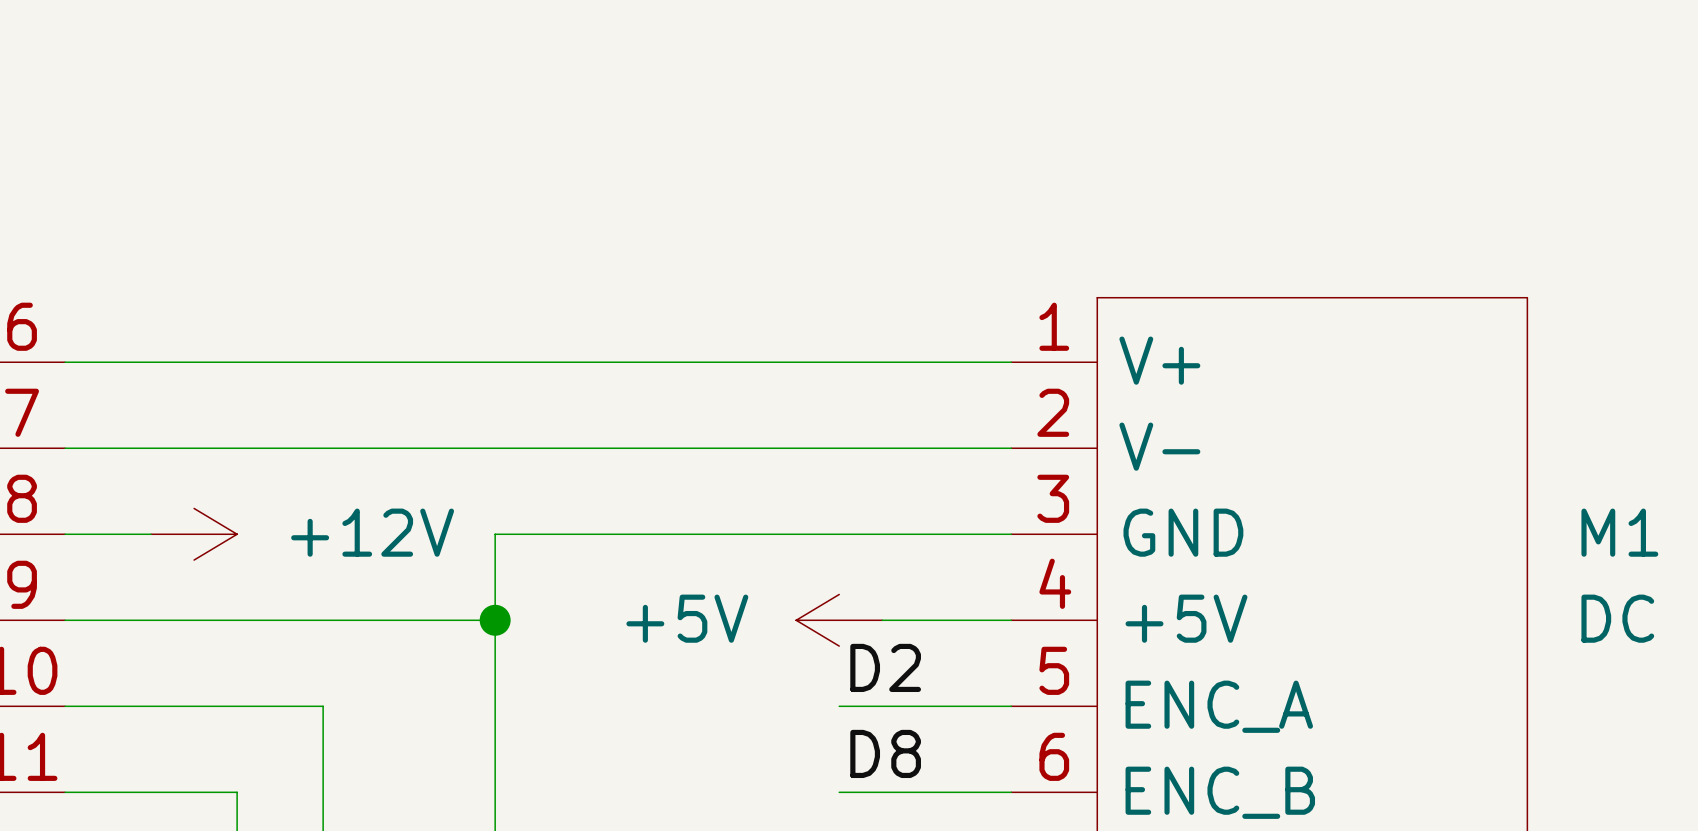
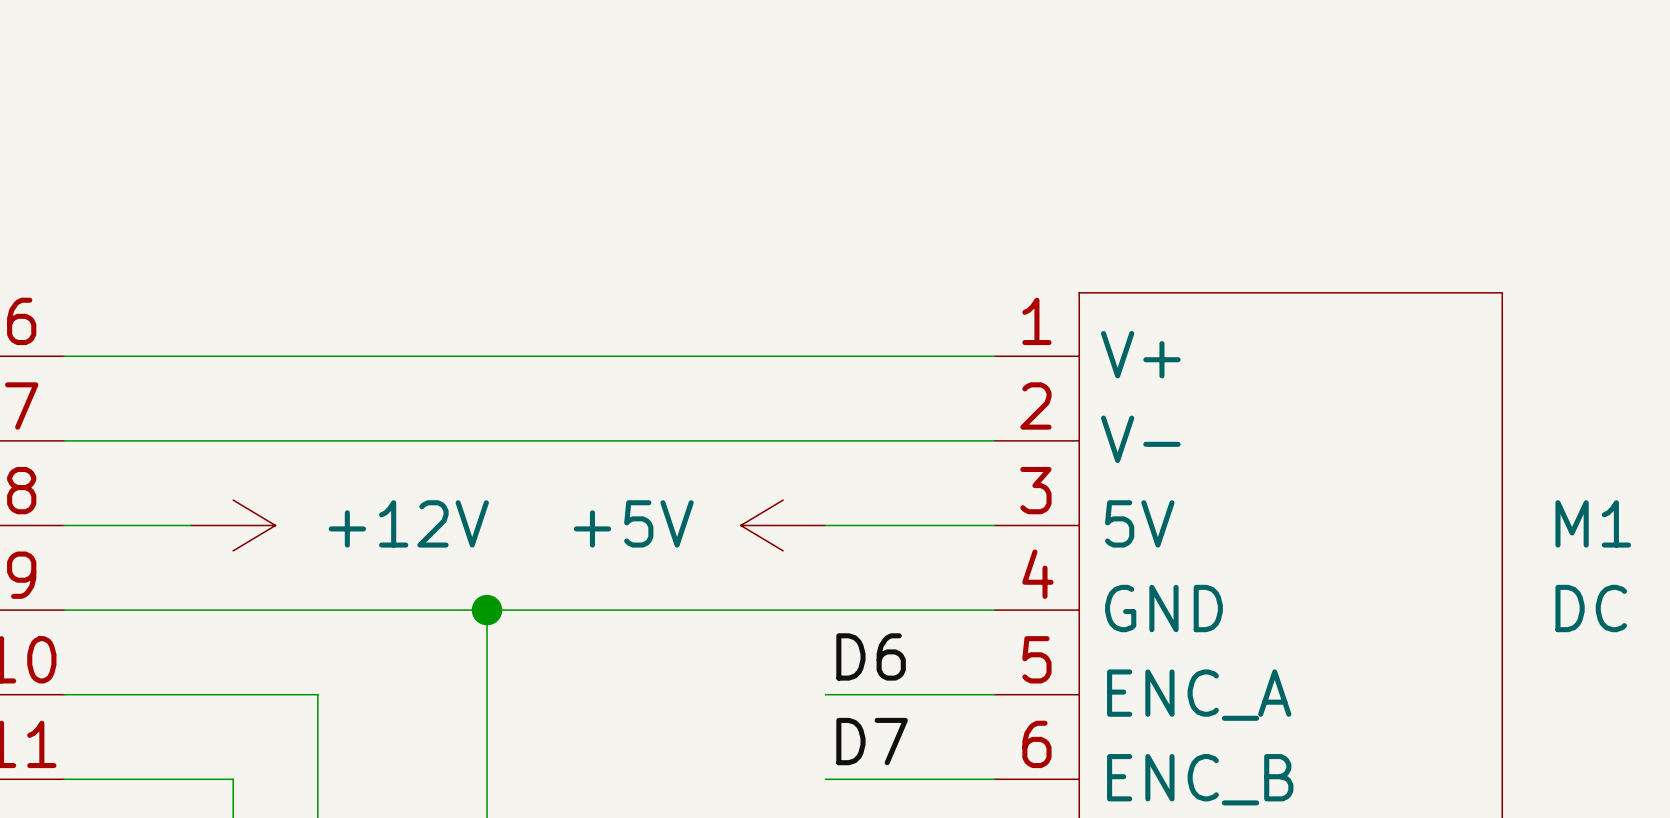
M1 pin name: GND (1183, 532) -> 5V (1139, 523)
power symbol position: +12V (194, 534) -> +12V (233, 525)
wire: (839, 534) (495, 534) (495, 620) -> (867, 610) (487, 610)
M1 pin name: +5V (1186, 618) -> GND (1163, 608)
power symbol position: +5V (839, 620) -> +5V (783, 525)
label: D2 (885, 667) -> D6 (871, 656)
label: D8 (885, 753) -> D7 (872, 741)

